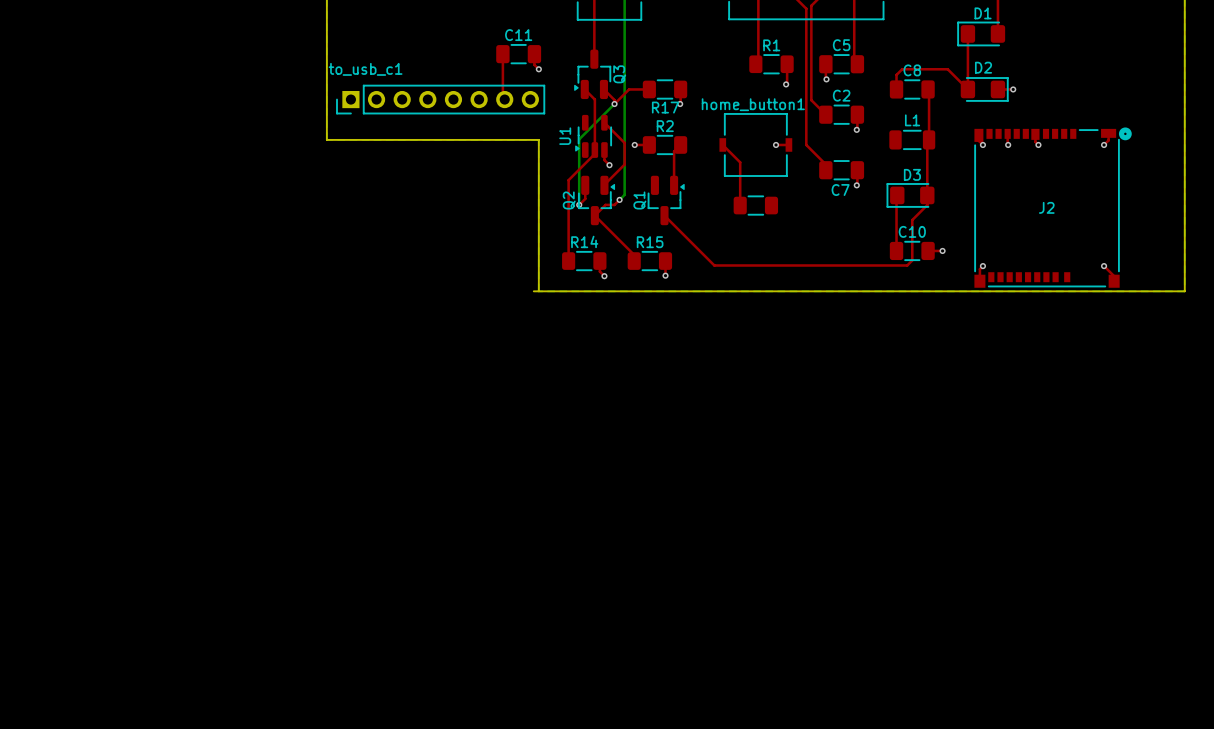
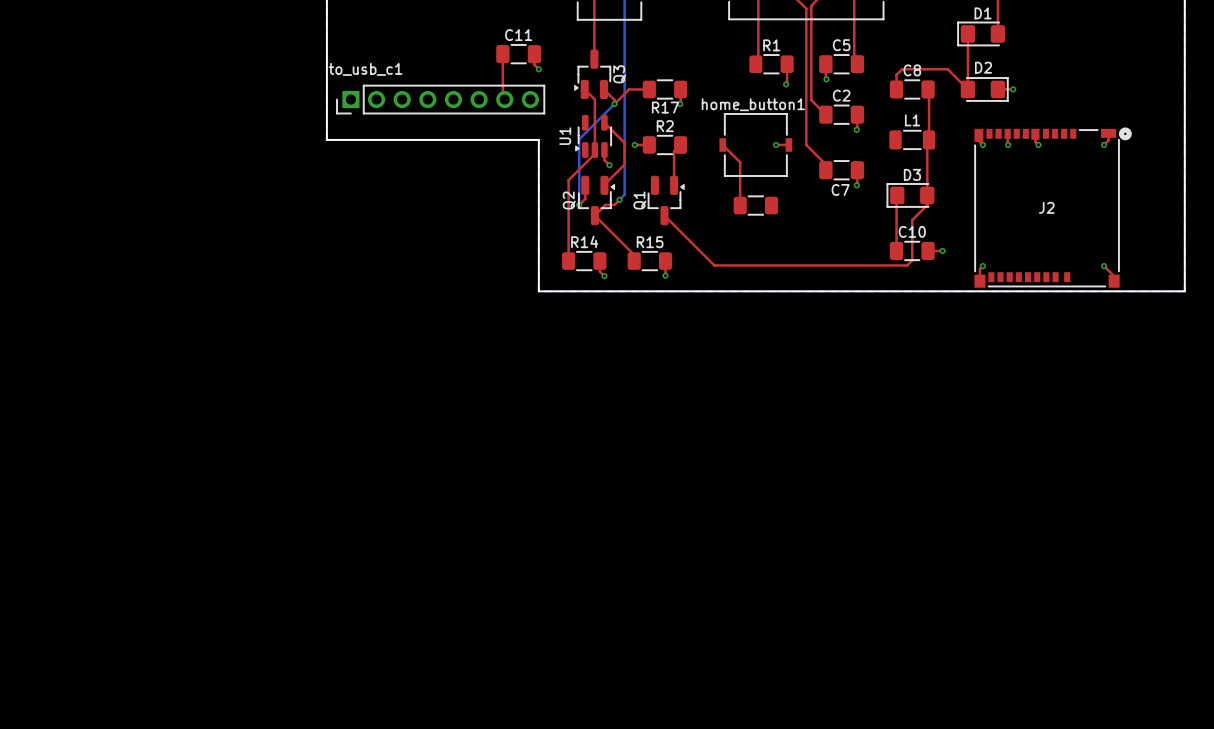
board edge: (533, 291) (538, 291) -> none

